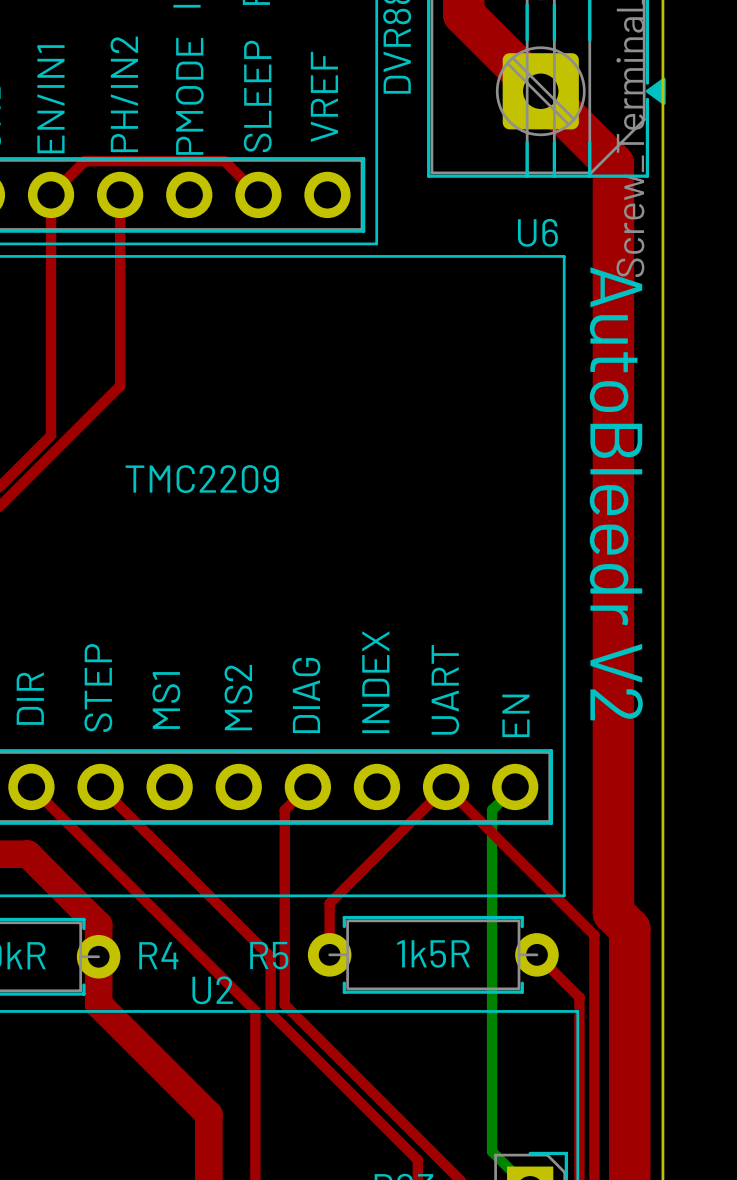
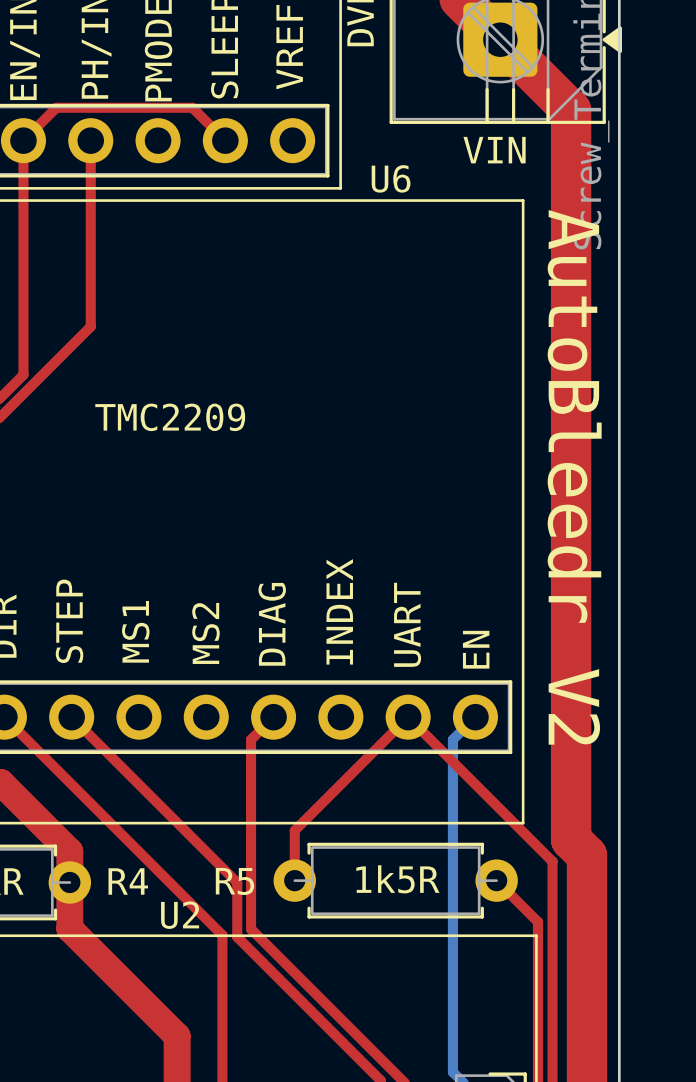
text: none -> VIN (494, 150)
U6 name position: U6 (537, 232) -> U6 (391, 178)

